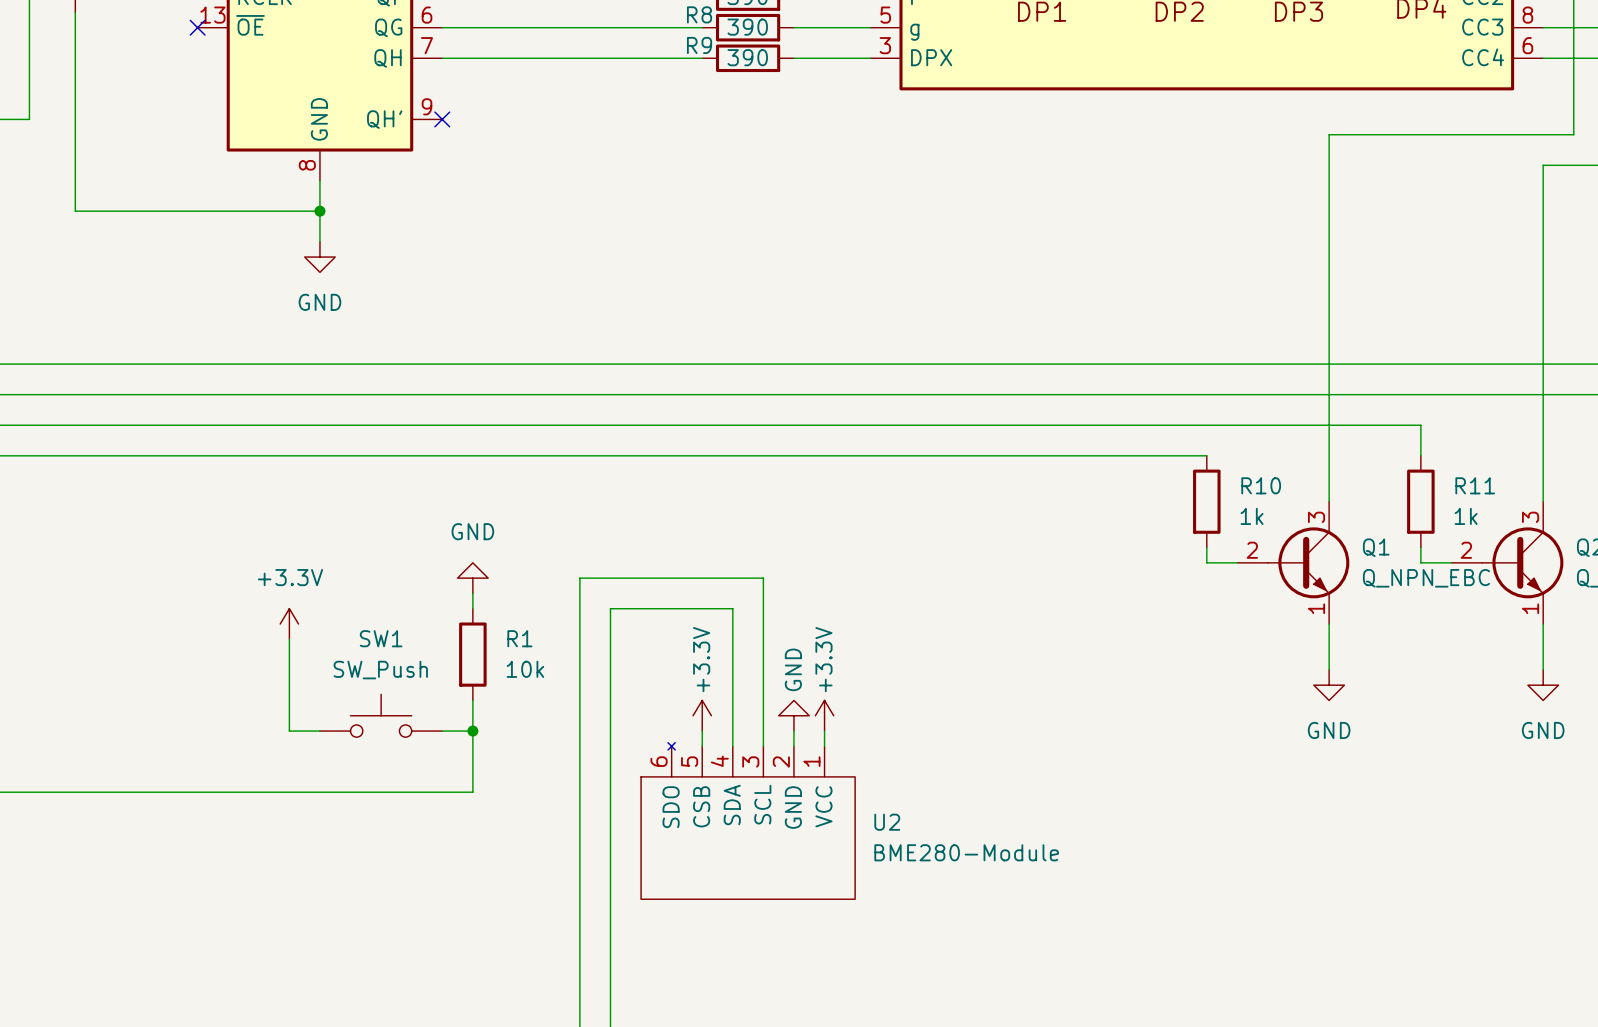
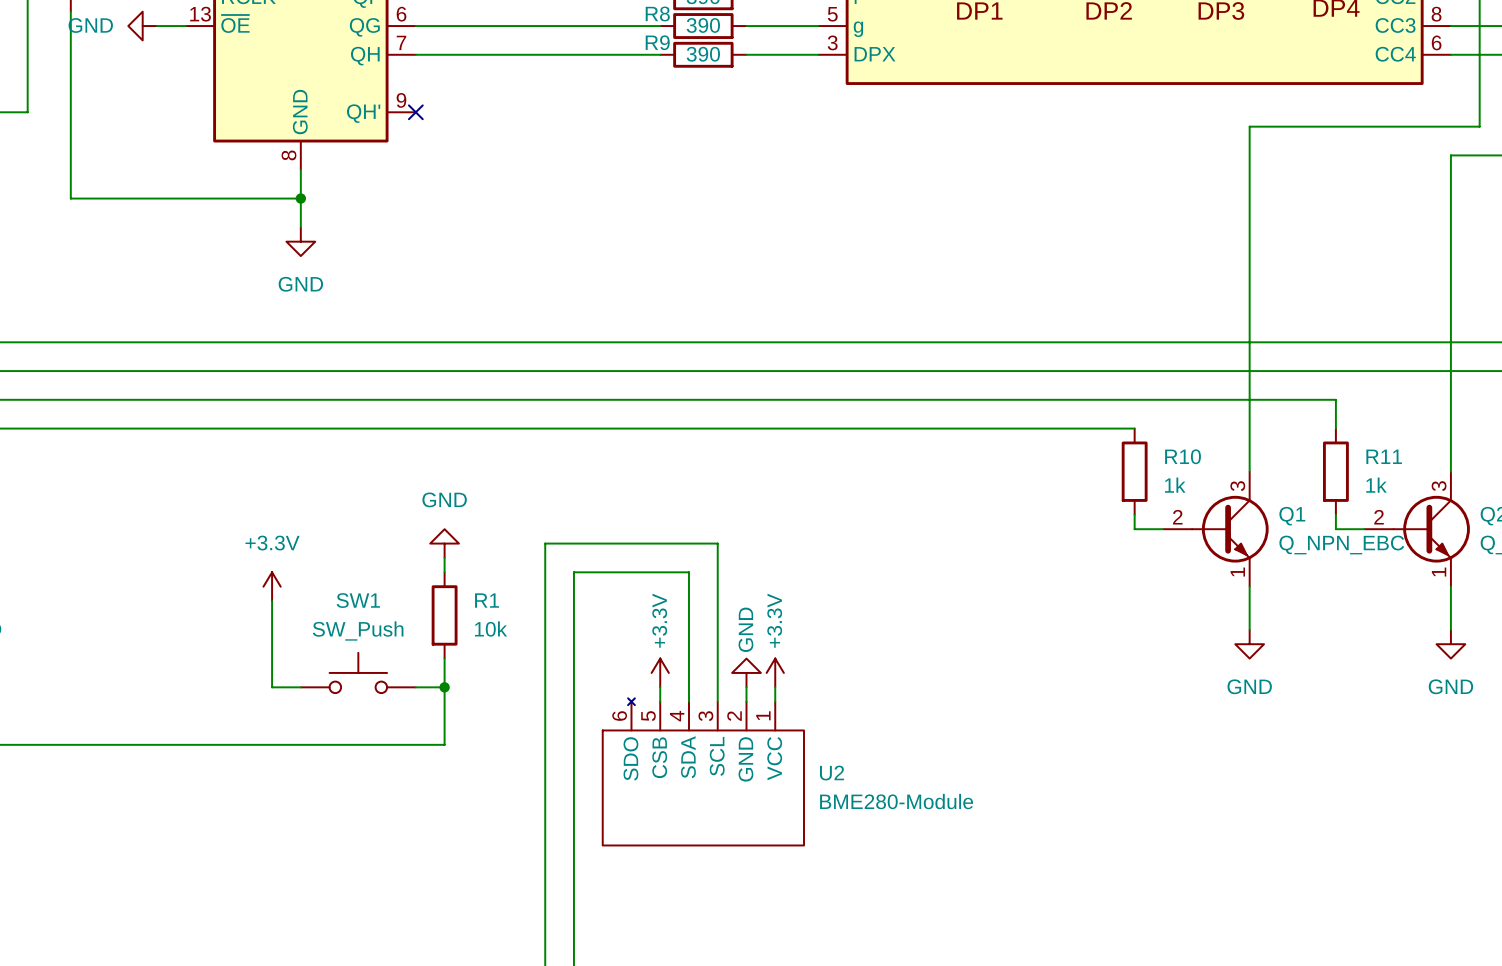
power symbol: none -> GND (142, 26)
wire: none -> (157, 26) (185, 26)
no-connect mark: (197, 27) -> none

